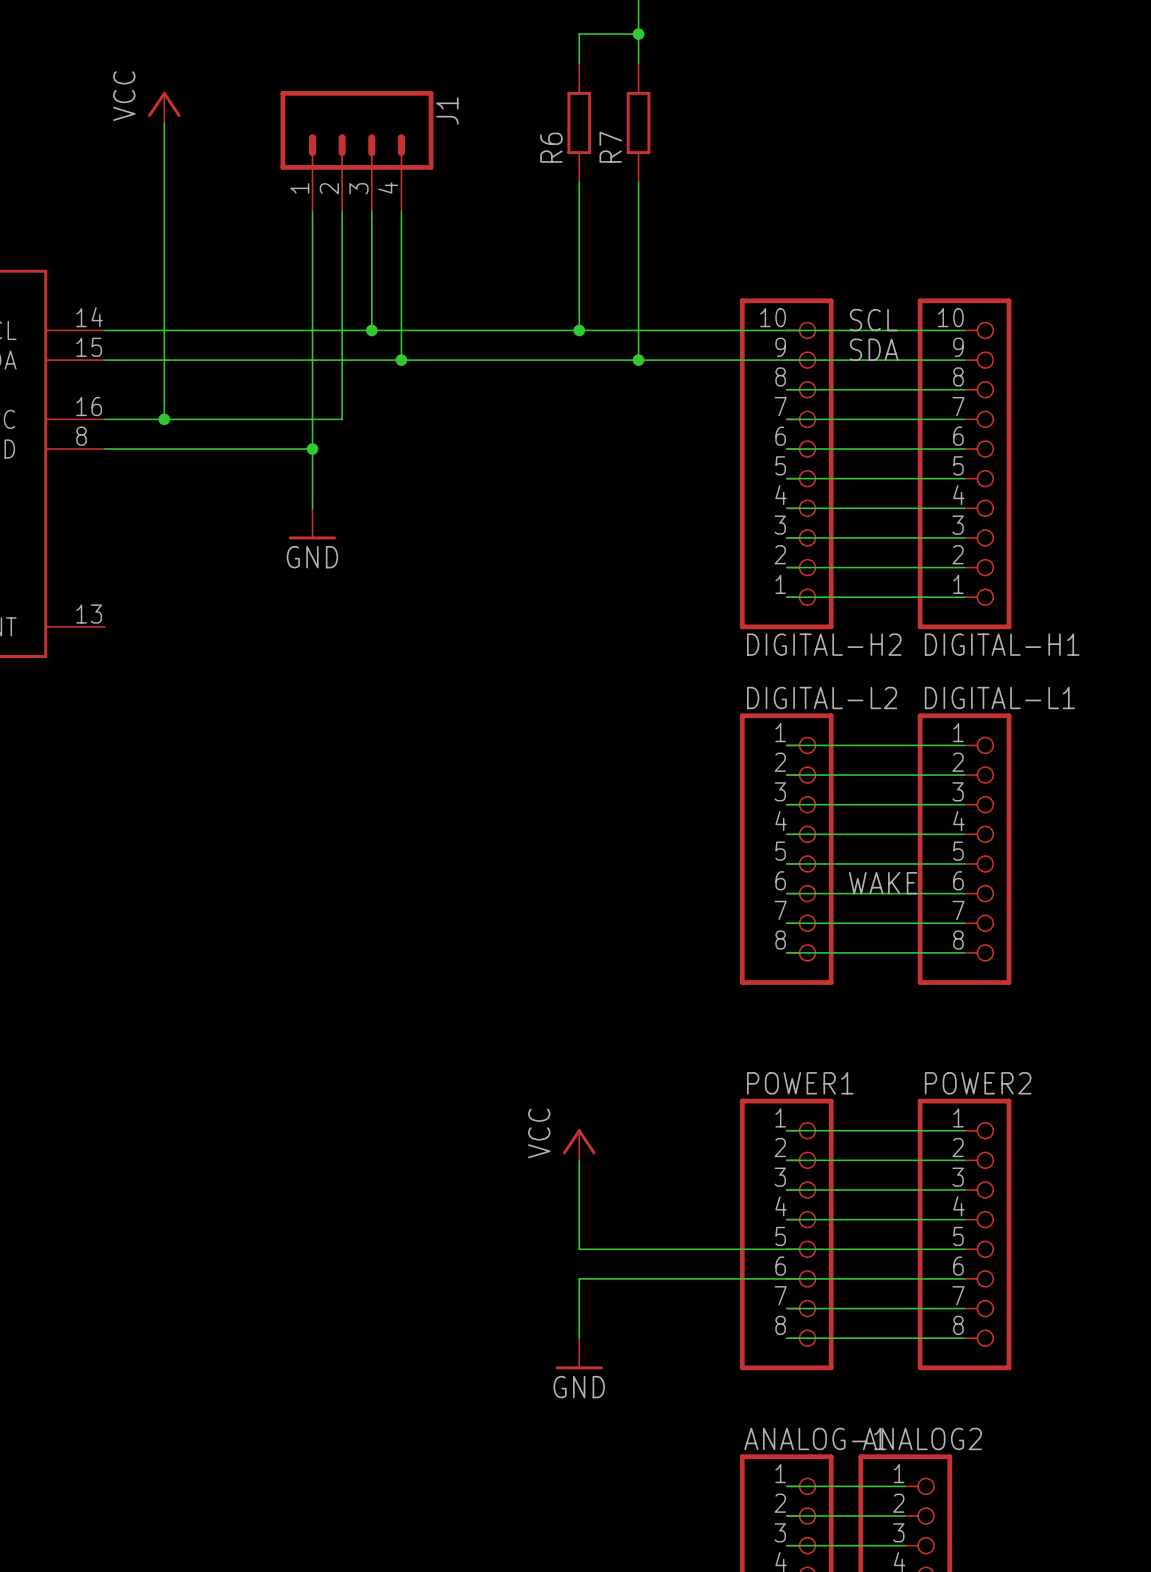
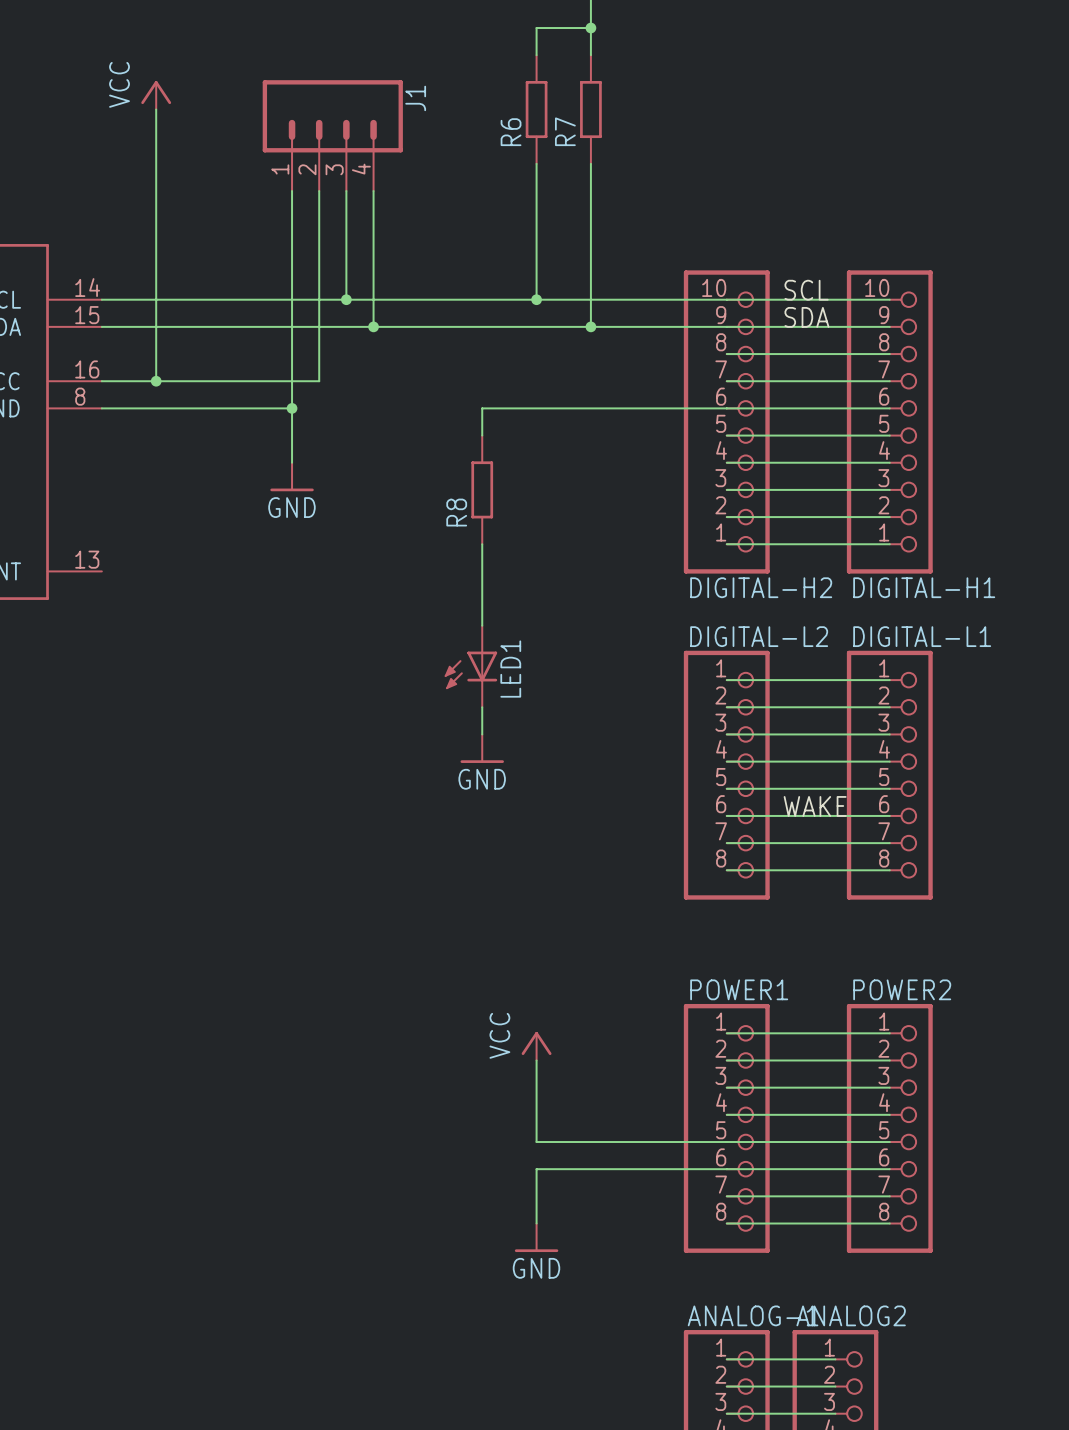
wire: none -> (726, 408) (482, 408) (482, 435)
R8: none -> (482, 489)
wire: none -> (482, 544) (482, 625)
LED1: none -> (470, 666)
wire: none -> (482, 707) (482, 734)
power symbol: none -> GND (482, 748)

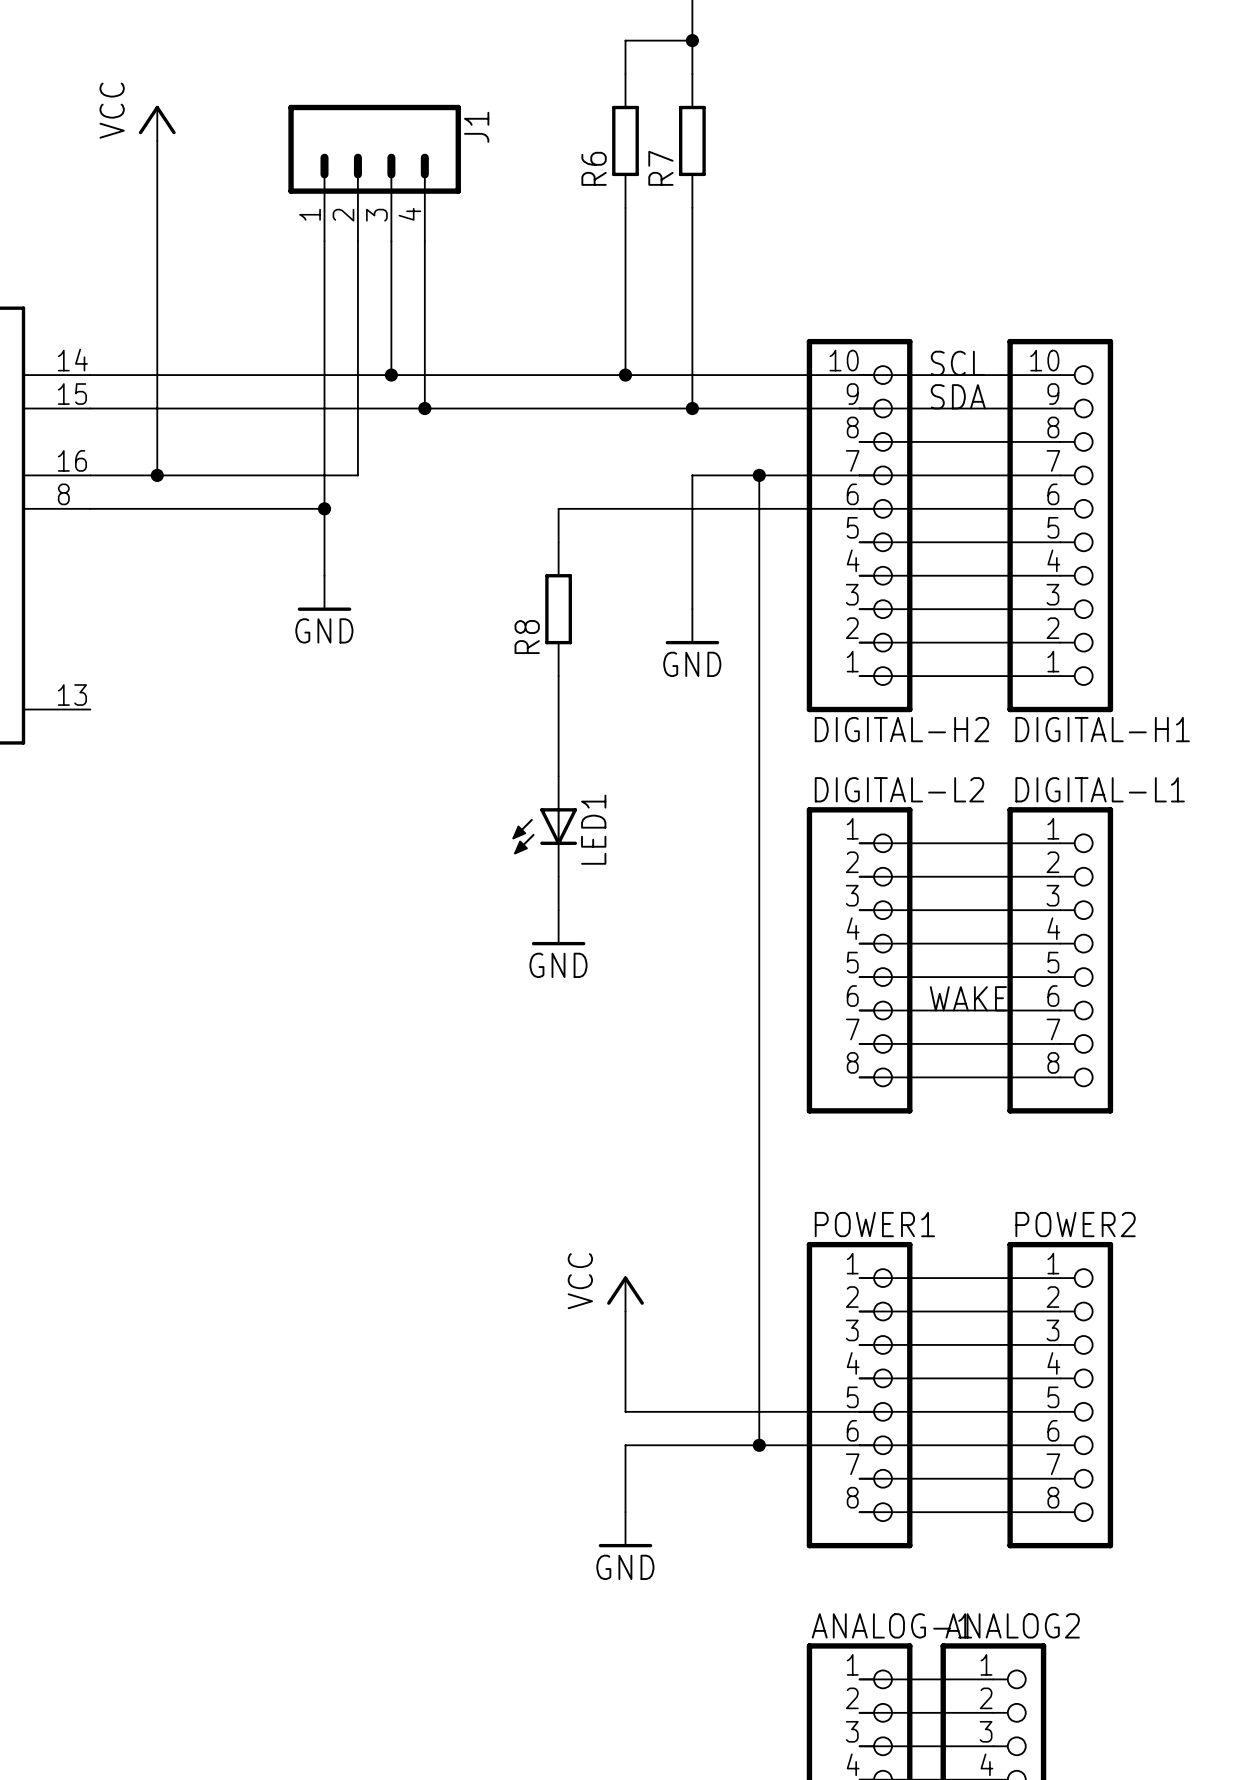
wire: none -> (759, 475) (759, 1445)
junction: none -> (759, 475)
wire: none -> (859, 475) (692, 475) (692, 609)
power symbol: none -> GND (692, 626)
junction: none -> (759, 1445)

